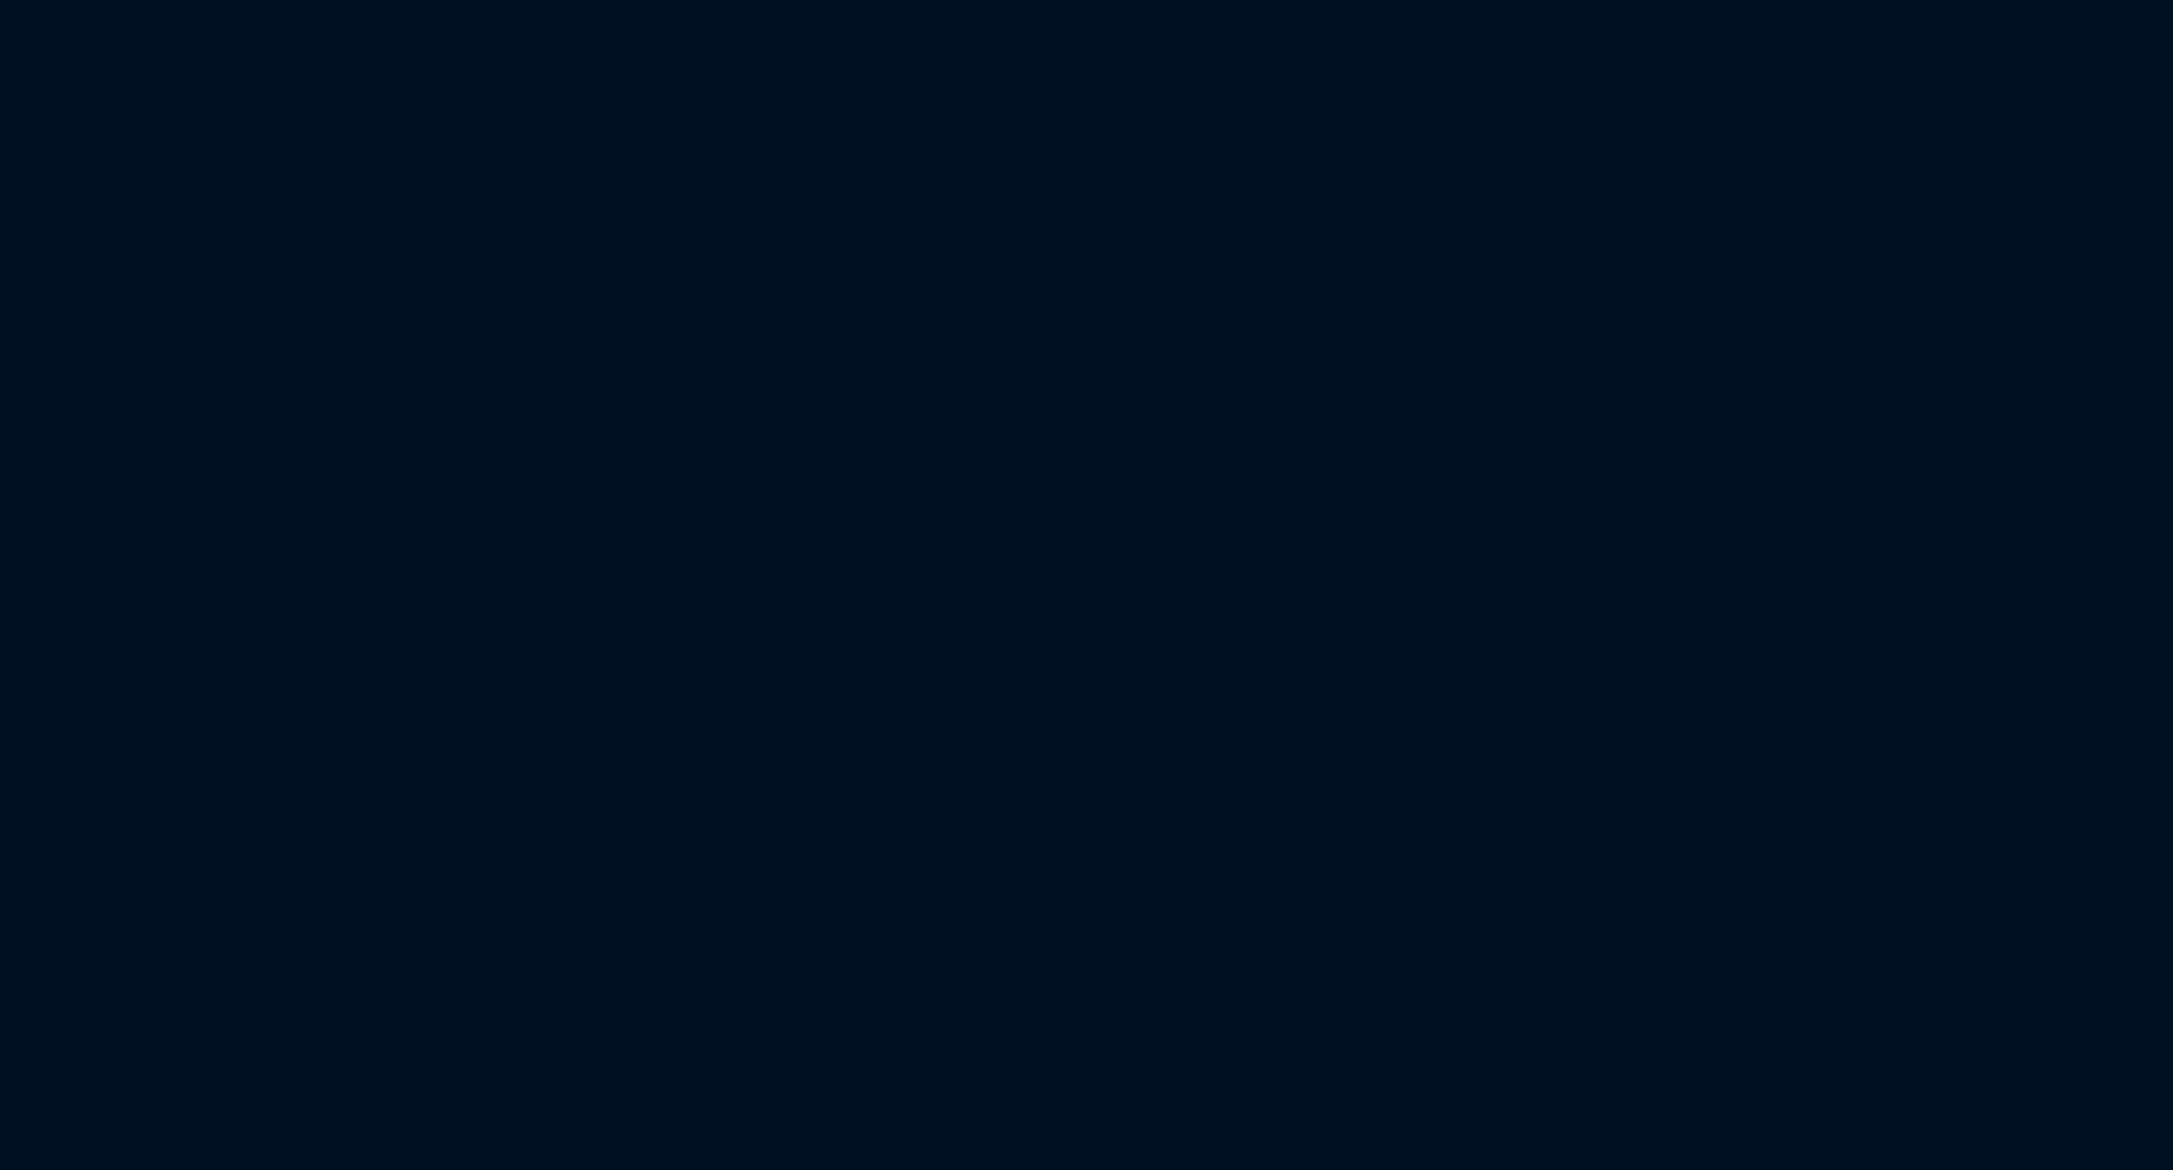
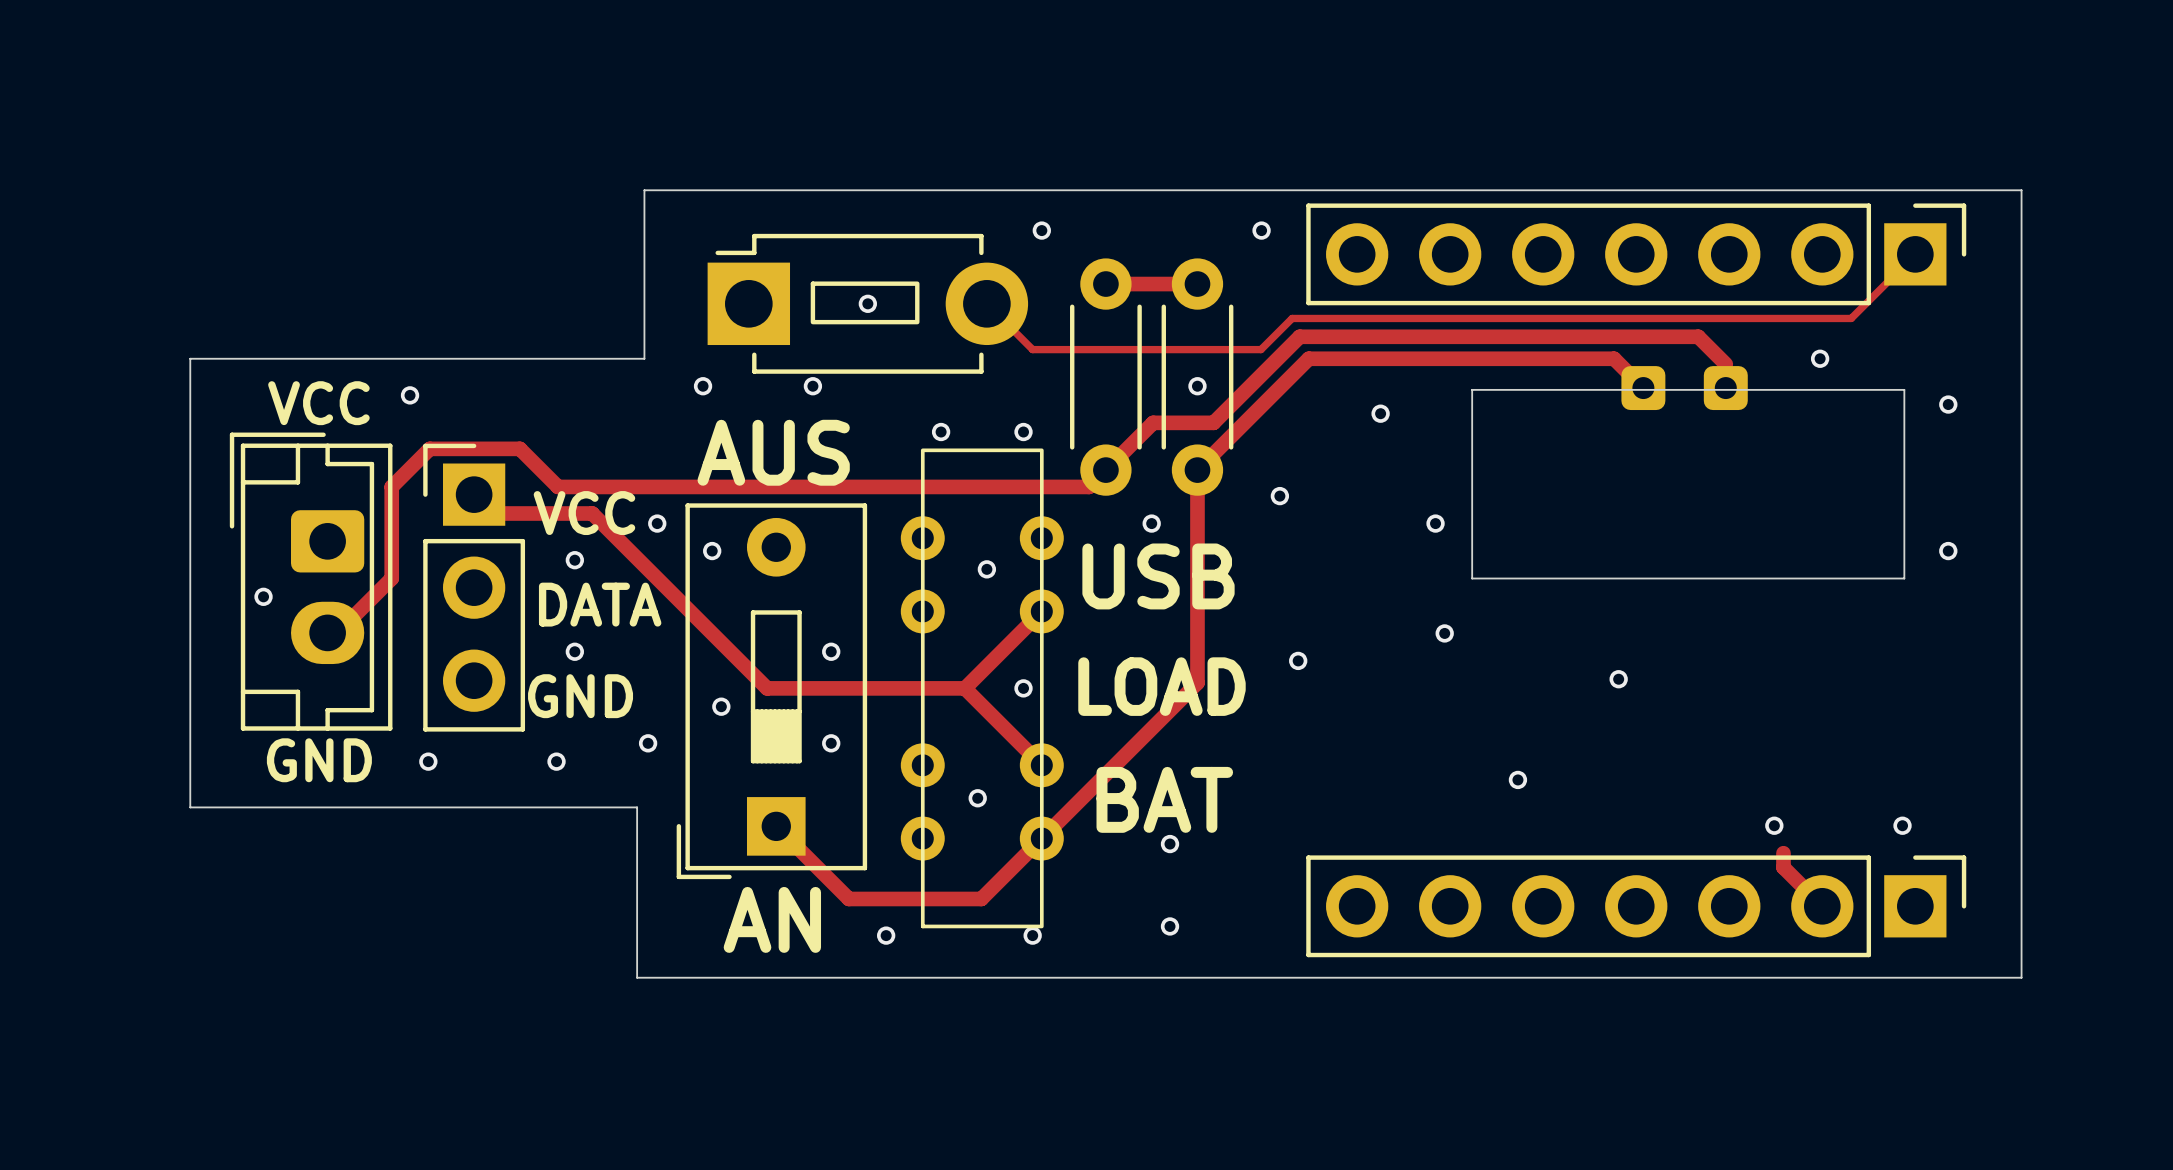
board edge: none -> (644, 190) (644, 358) (190, 358) (190, 807) (637, 807) (637, 977) (2021, 977) (2021, 190) (644, 190)
via: none -> (1041, 230)
via: none -> (1261, 230)
part: none -> (1636, 254)
track: none -> (1915, 254) (1851, 318) (1292, 318) (1261, 349) (1032, 349) (986, 303)
track: none -> (1105, 284) (1197, 284)
part: none -> (867, 303)
via: none -> (867, 303)
via: none -> (1820, 358)
track: none -> (1725, 364) (1698, 336) (1299, 336) (1213, 422) (1153, 422) (1089, 486) (558, 486) (519, 448) (429, 448) (391, 486) (391, 578) (318, 651)
part: none -> (1105, 377)
part: none -> (1197, 377)
via: none -> (703, 386)
via: none -> (812, 386)
via: none -> (1197, 386)
track: none -> (1643, 388) (1614, 358) (1308, 358) (1197, 470) (1197, 682) (981, 898) (848, 898) (776, 826) (757, 826)
part: none -> (1684, 388)
board edge: none -> (1472, 389) (1904, 389) (1904, 578) (1472, 578) (1472, 389)
via: none -> (410, 395)
text: none -> VCC (318, 403)
via: none -> (1948, 404)
via: none -> (1380, 413)
via: none -> (941, 432)
via: none -> (1023, 432)
text: none -> AUS (773, 452)
via: none -> (1279, 496)
track: none -> (468, 510) (464, 513) (592, 513) (767, 688) (964, 688)
text: none -> VCC (584, 513)
via: none -> (657, 523)
via: none -> (1151, 523)
via: none -> (1435, 523)
via: none -> (712, 551)
via: none -> (1948, 551)
via: none -> (574, 560)
via: none -> (986, 569)
text: none -> USB (1158, 576)
part: none -> (311, 581)
part: none -> (474, 587)
via: none -> (263, 596)
text: none -> DATA (600, 604)
track: none -> (1041, 611) (964, 688)
via: none -> (1444, 633)
via: none -> (574, 651)
via: none -> (831, 651)
via: none -> (1298, 660)
via: none -> (1618, 679)
text: none -> LOAD (1161, 686)
track: none -> (964, 688) (1041, 765)
part: none -> (982, 688)
via: none -> (1023, 688)
part: none -> (771, 691)
text: none -> GND (580, 696)
via: none -> (721, 706)
via: none -> (648, 743)
via: none -> (831, 743)
text: none -> GND (319, 760)
via: none -> (428, 761)
via: none -> (556, 761)
via: none -> (1517, 779)
via: none -> (977, 798)
text: none -> BAT (1164, 799)
via: none -> (1774, 825)
via: none -> (1902, 825)
via: none -> (1170, 844)
track: none -> (1783, 853) (1783, 867) (1822, 906)
part: none -> (1636, 906)
text: none -> AN (772, 919)
via: none -> (1170, 926)
via: none -> (886, 935)
via: none -> (1032, 935)

